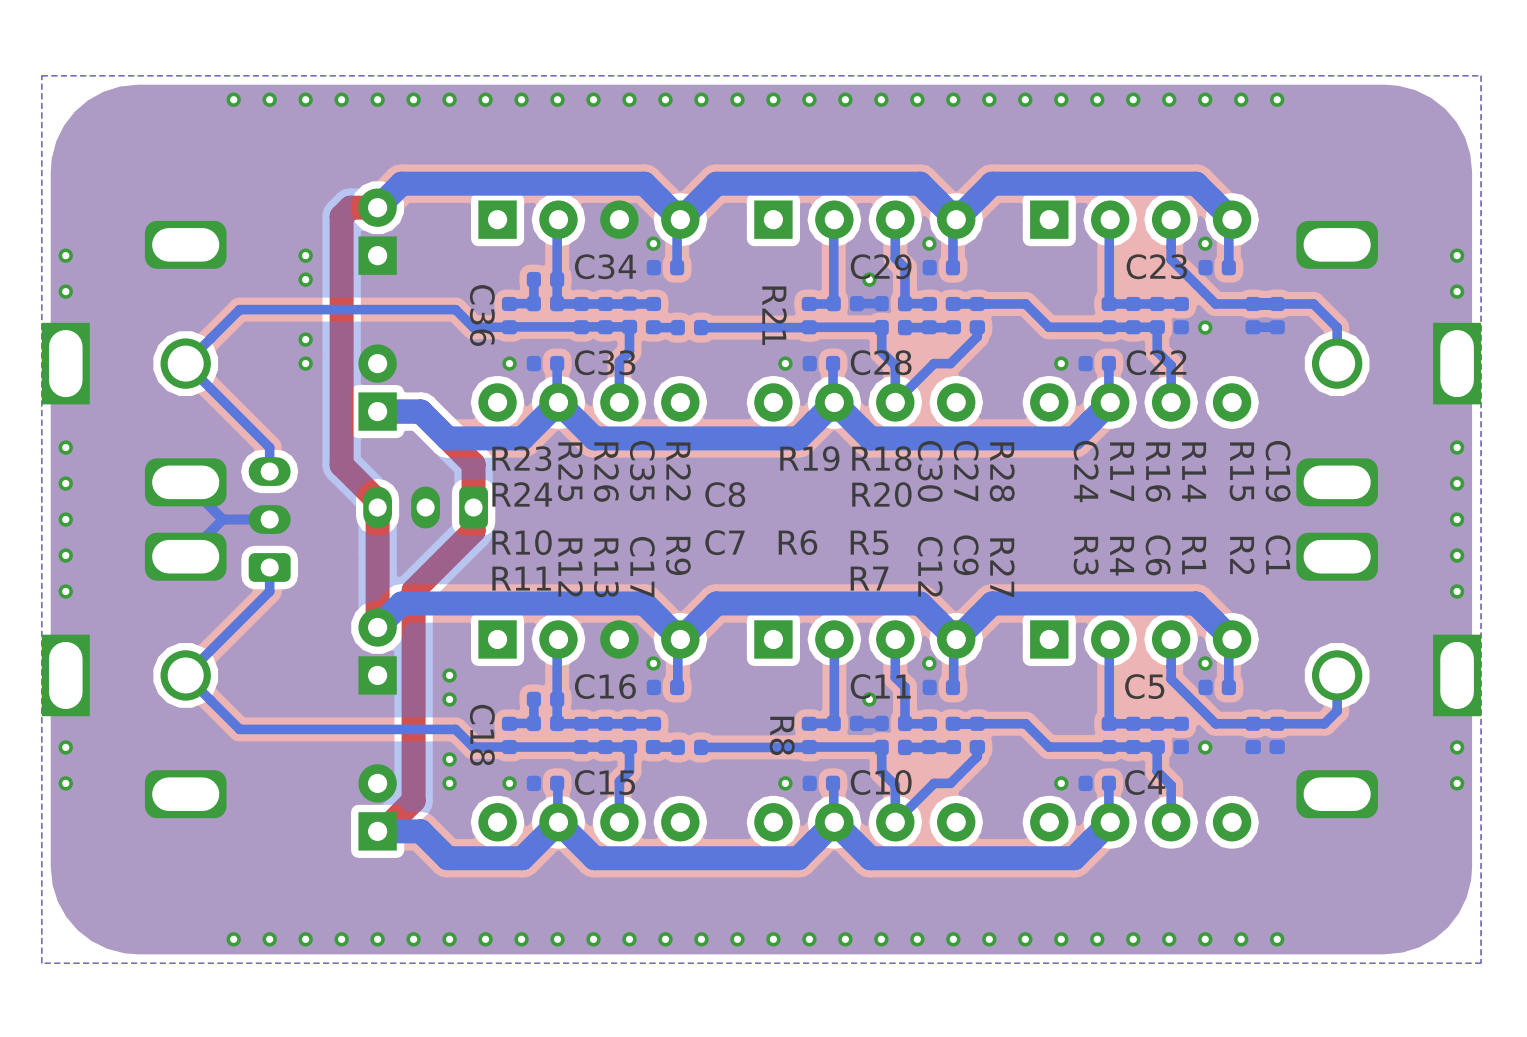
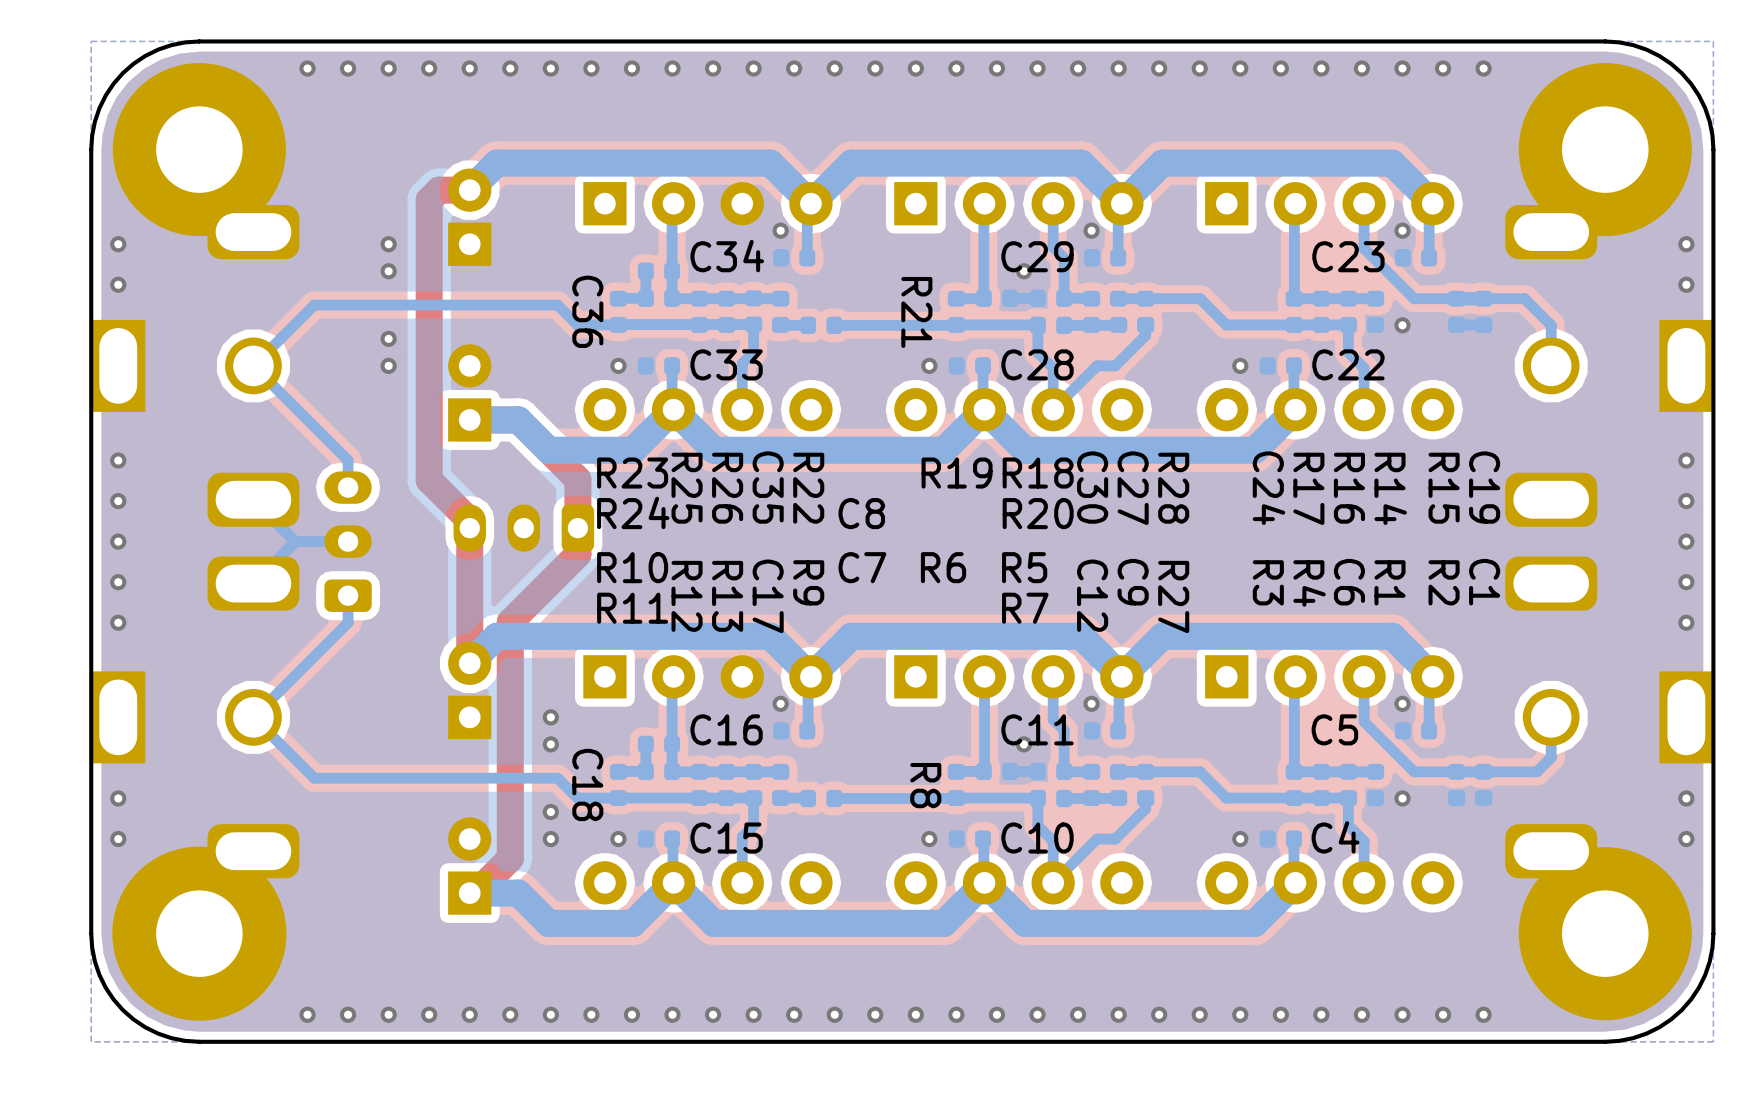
part: none -> (902, 541)

